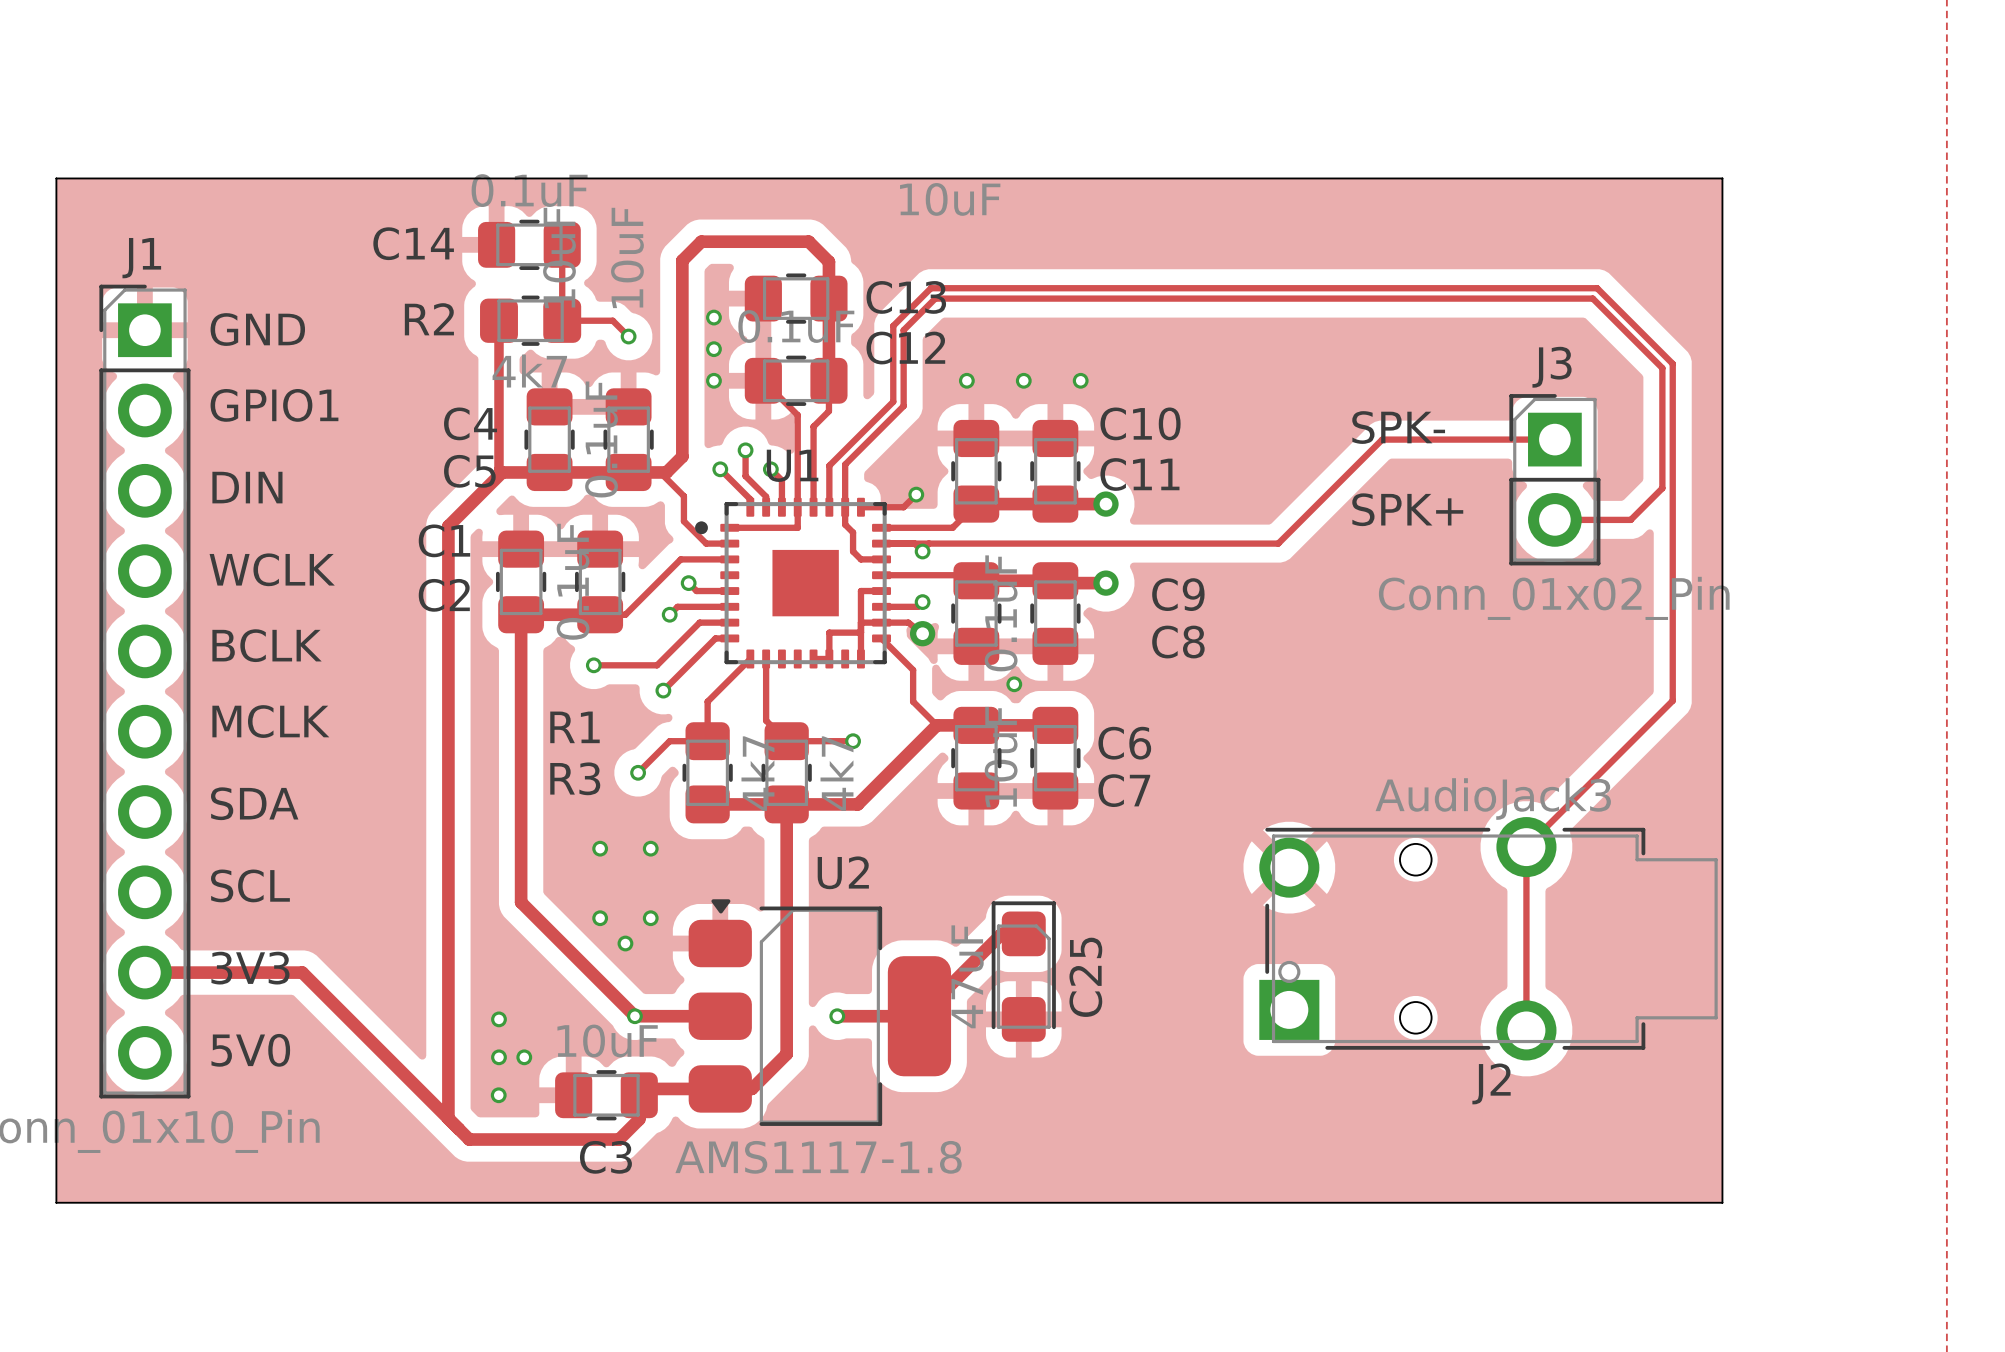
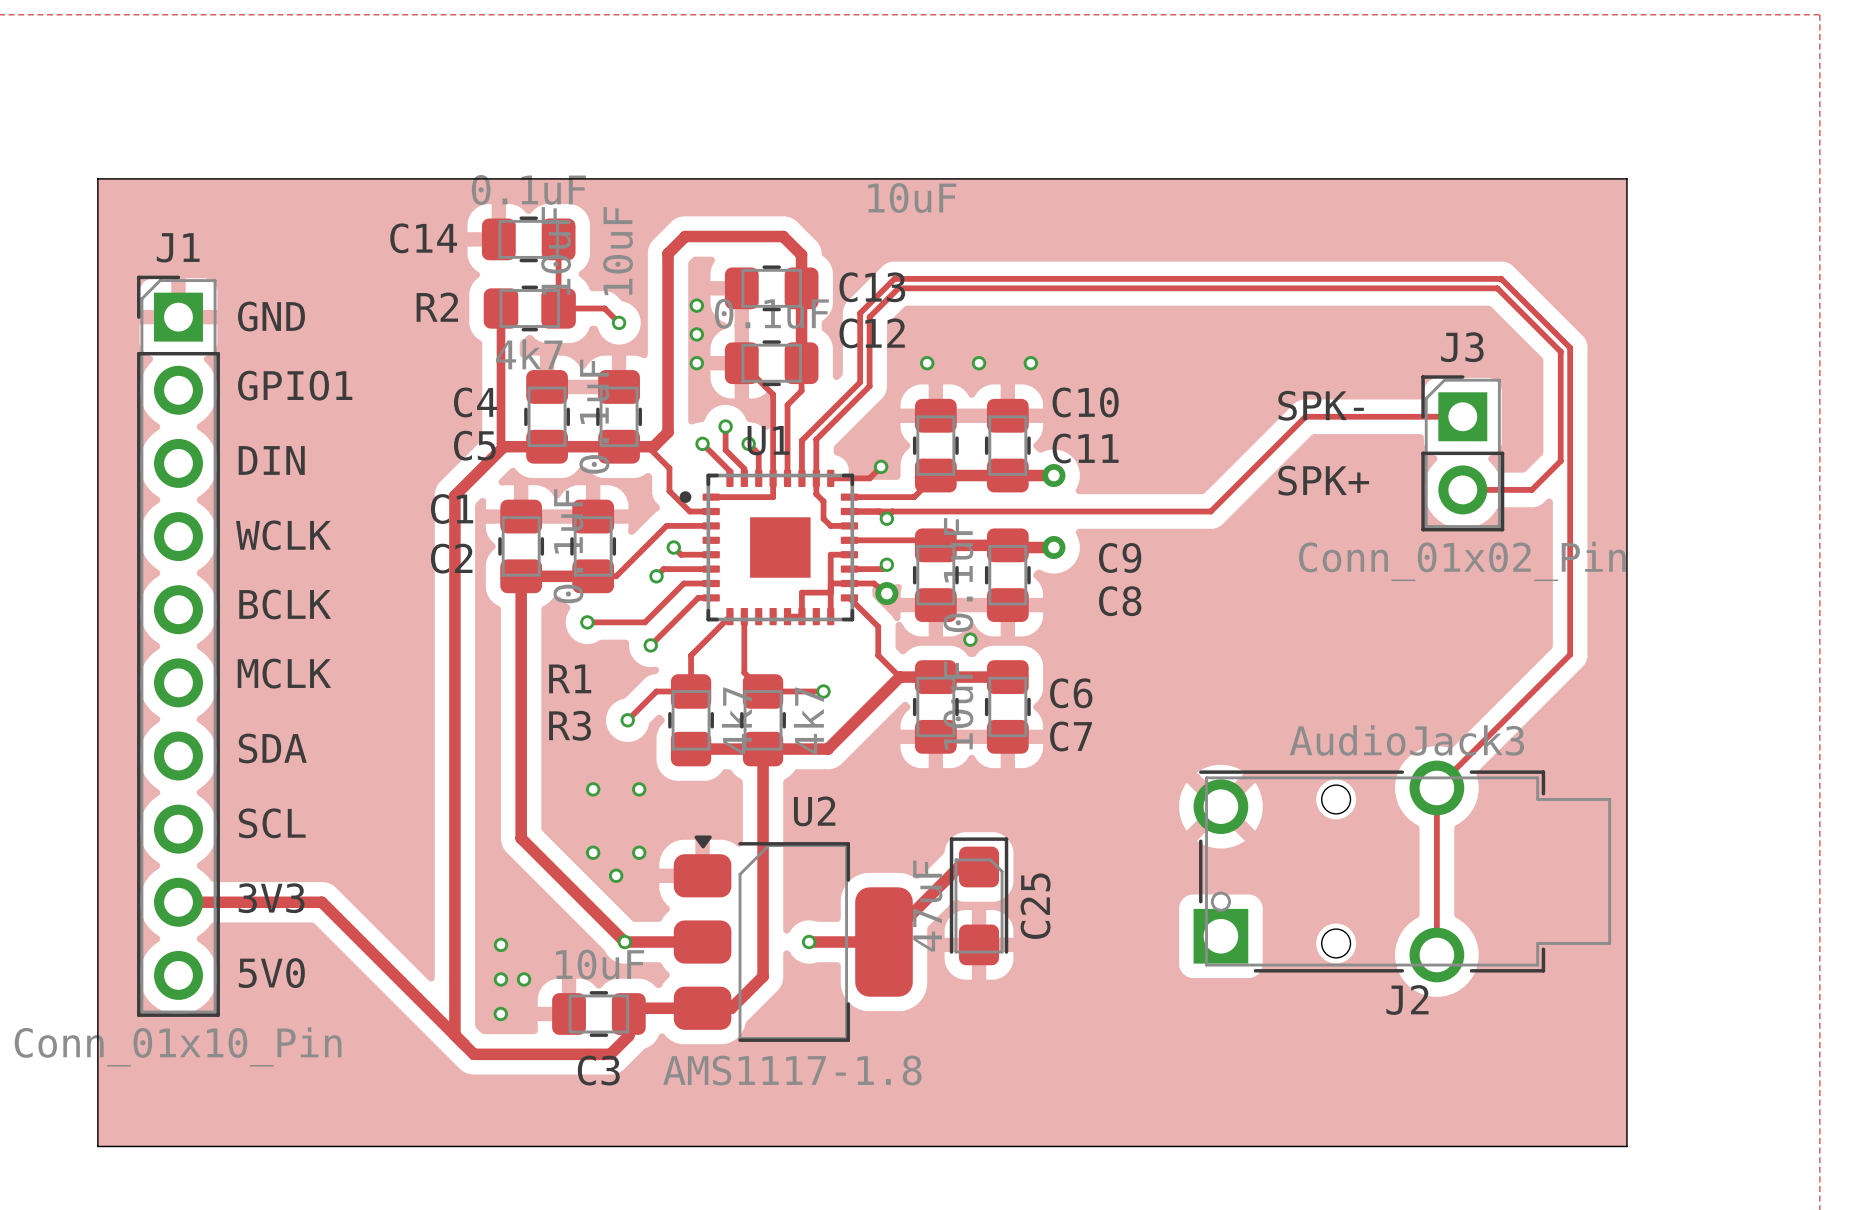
board edge: (1722, 178) (1722, 1202) (56, 1202) -> (1615, 178) (1626, 178) (1626, 1146) (97, 1146) (97, 1111)

